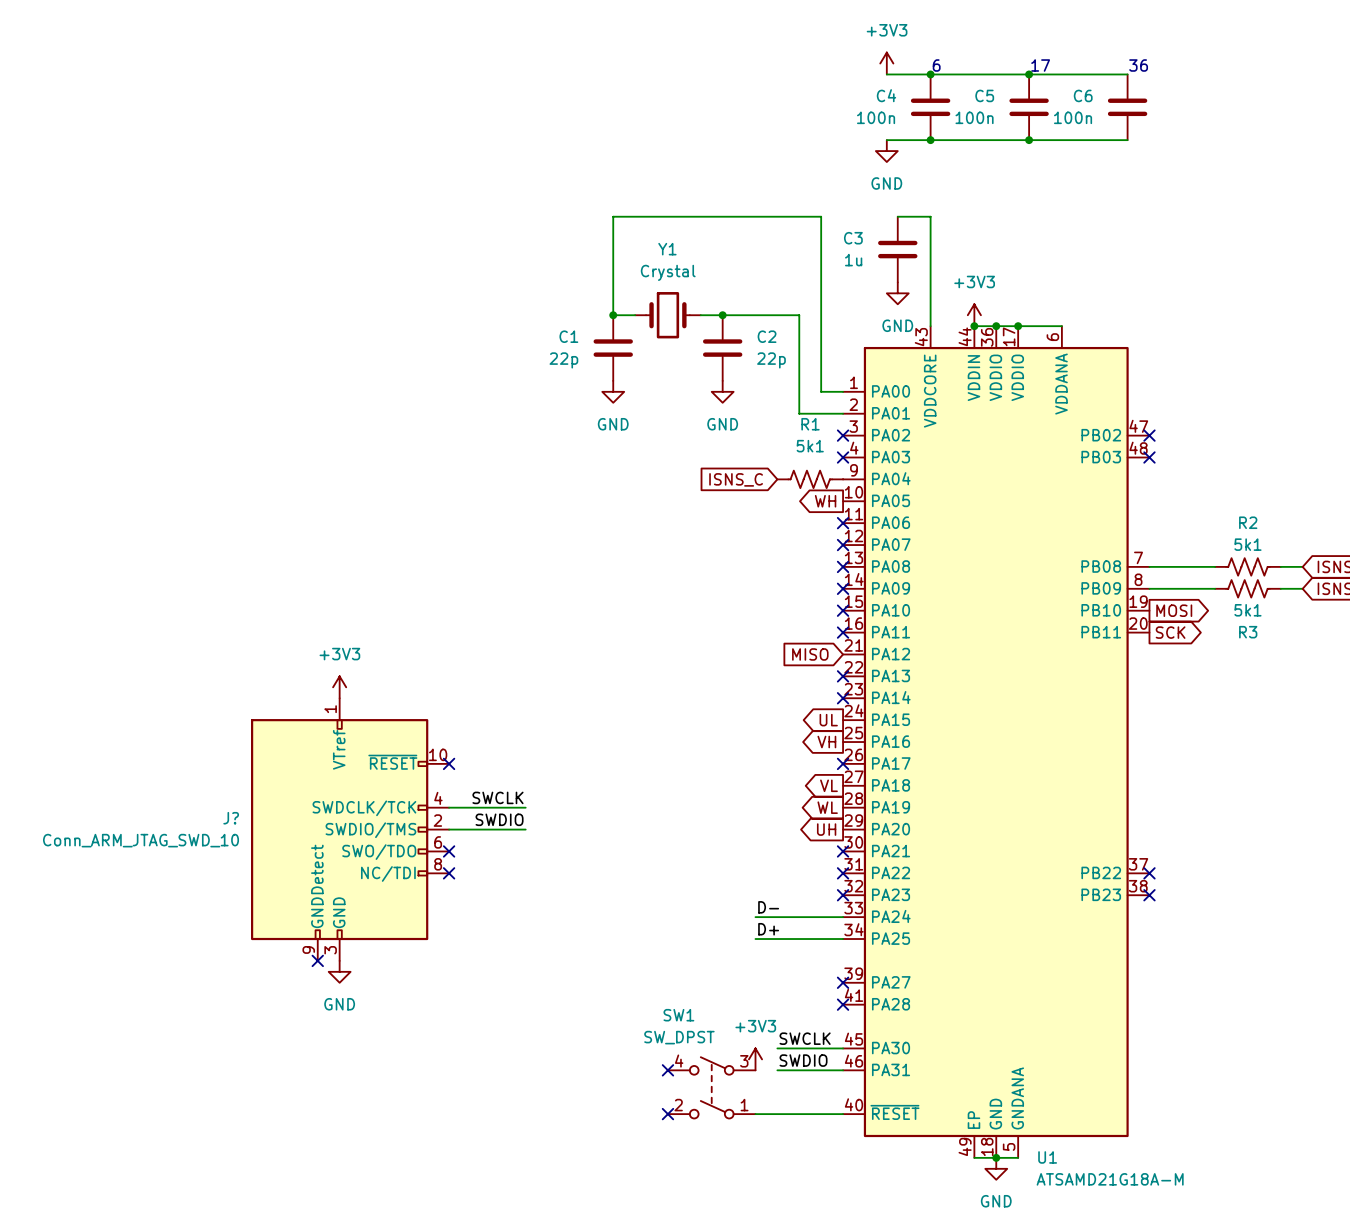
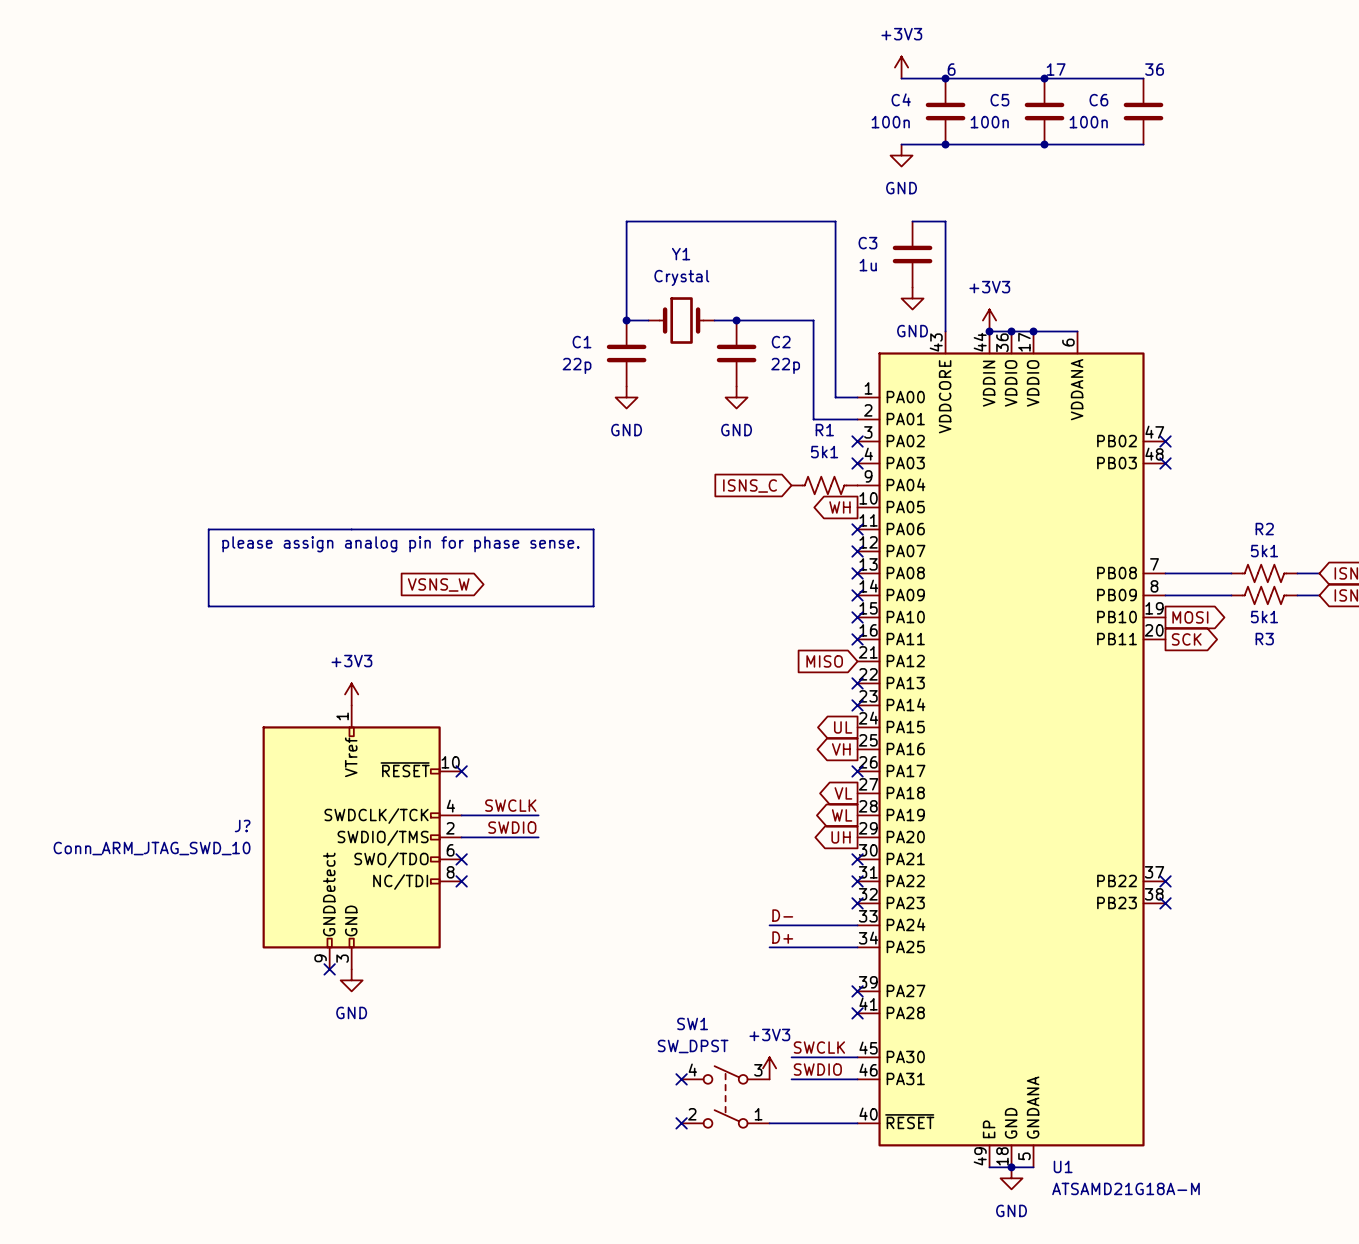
line: none -> (208, 529) (593, 529) (593, 606) (208, 606) (208, 529)
text: none -> please assign analog pin for phase sense. (400, 544)
global label: none -> VSNS_W (438, 584)

